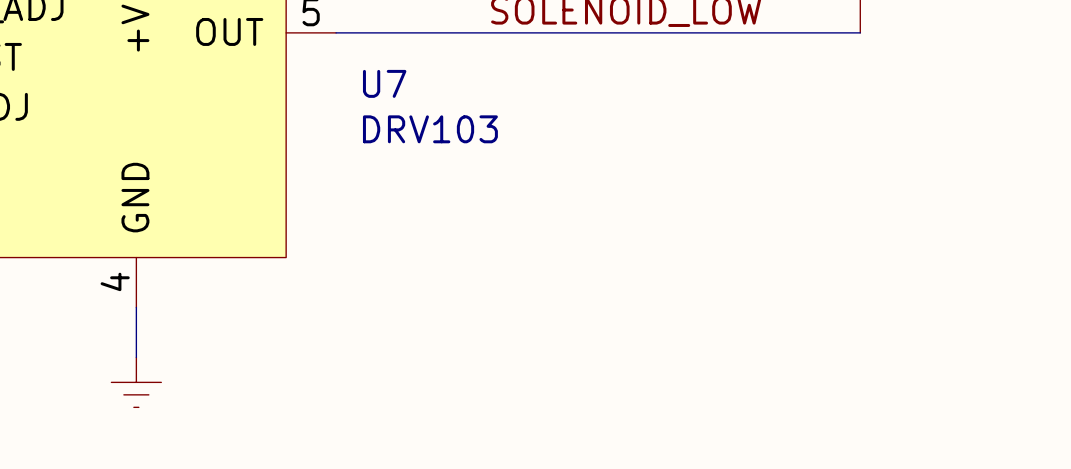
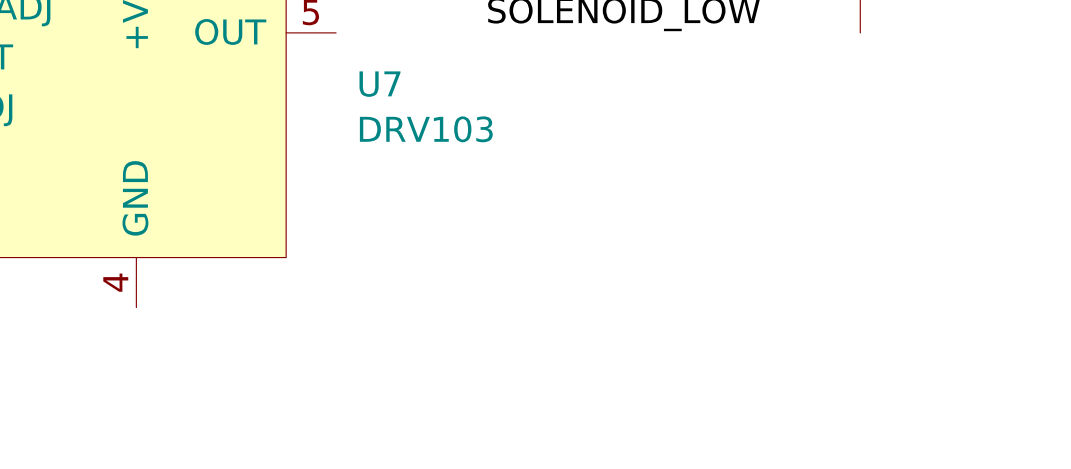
wire: (336, 32) (860, 32) -> none
wire: (136, 307) (136, 357) -> none
power symbol: (136, 382) -> none

